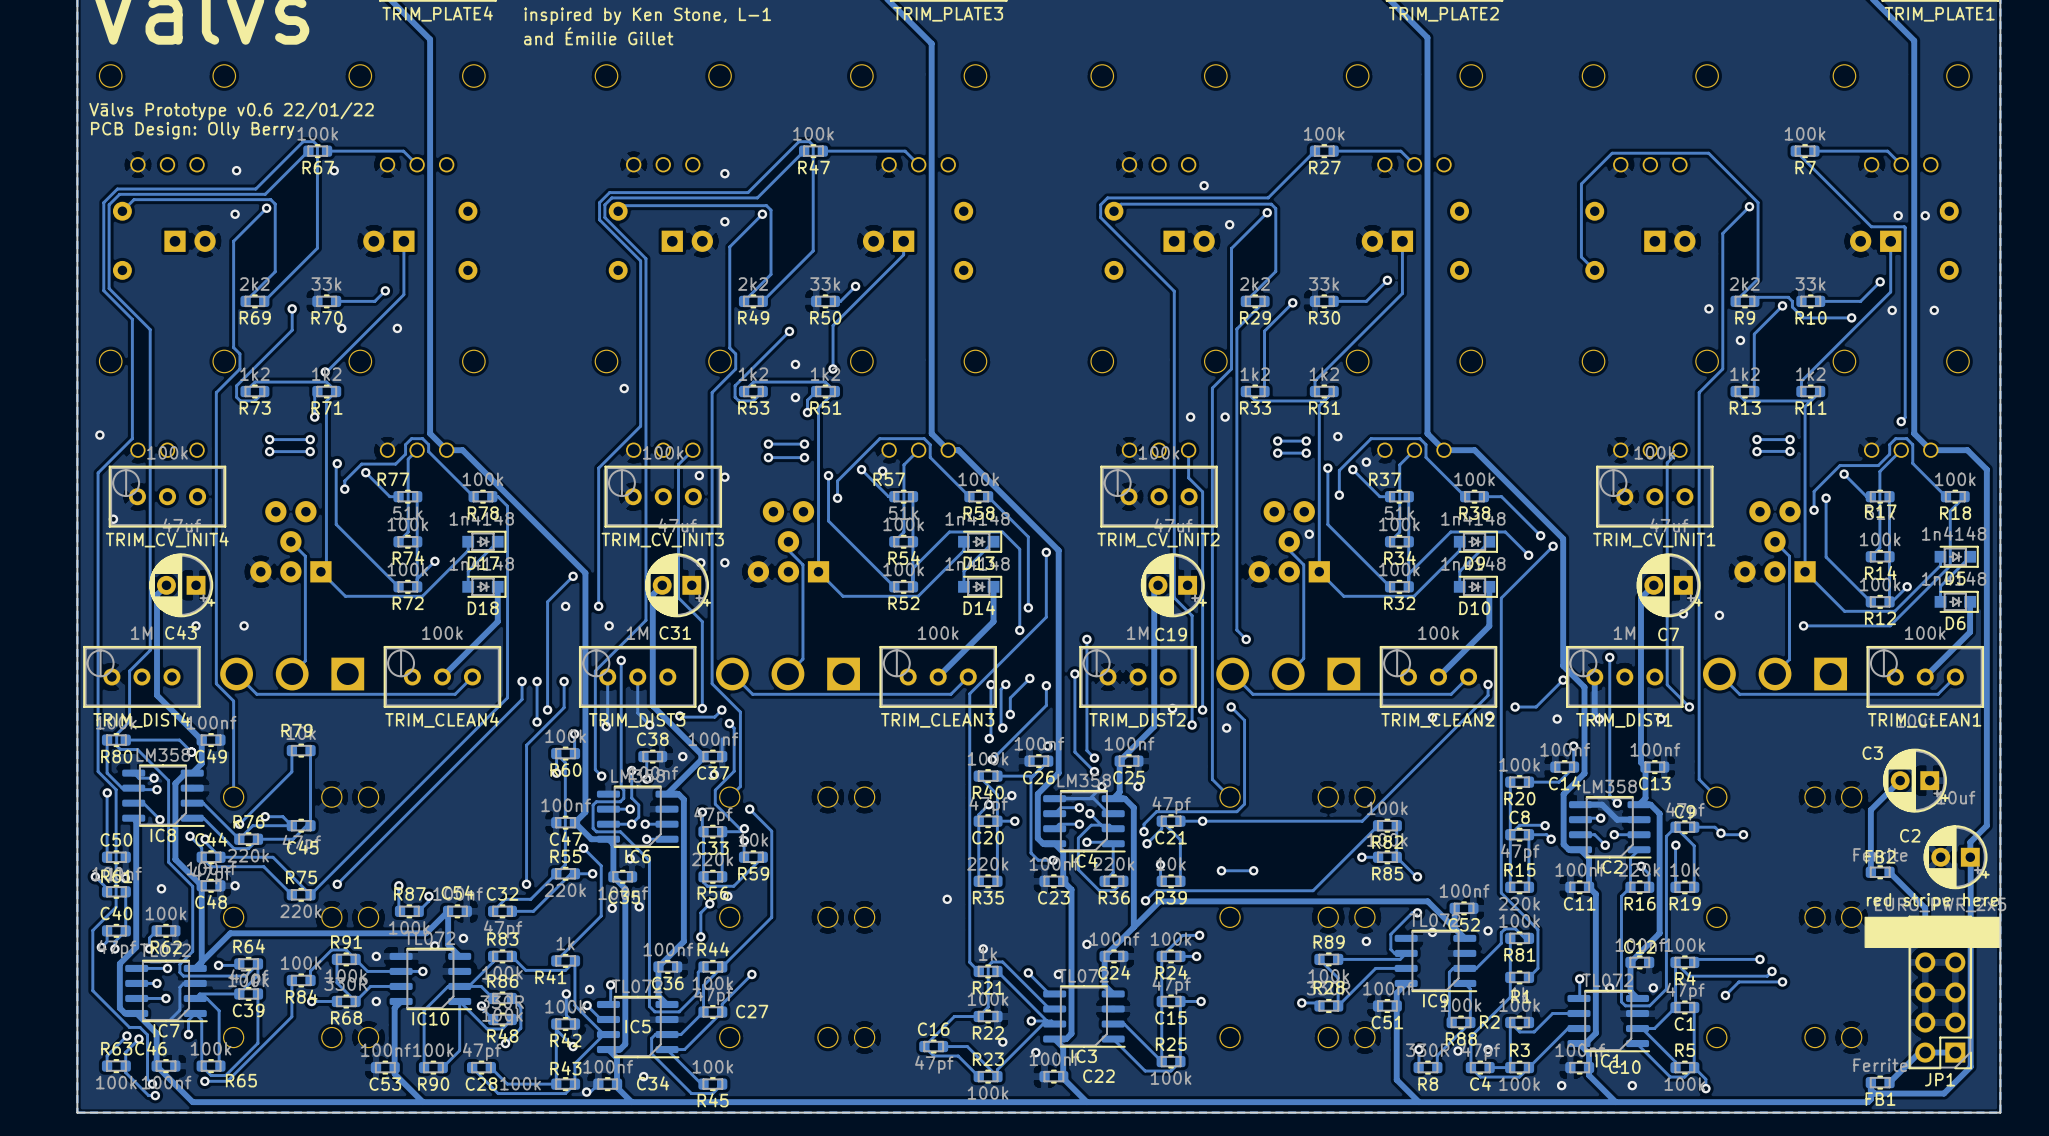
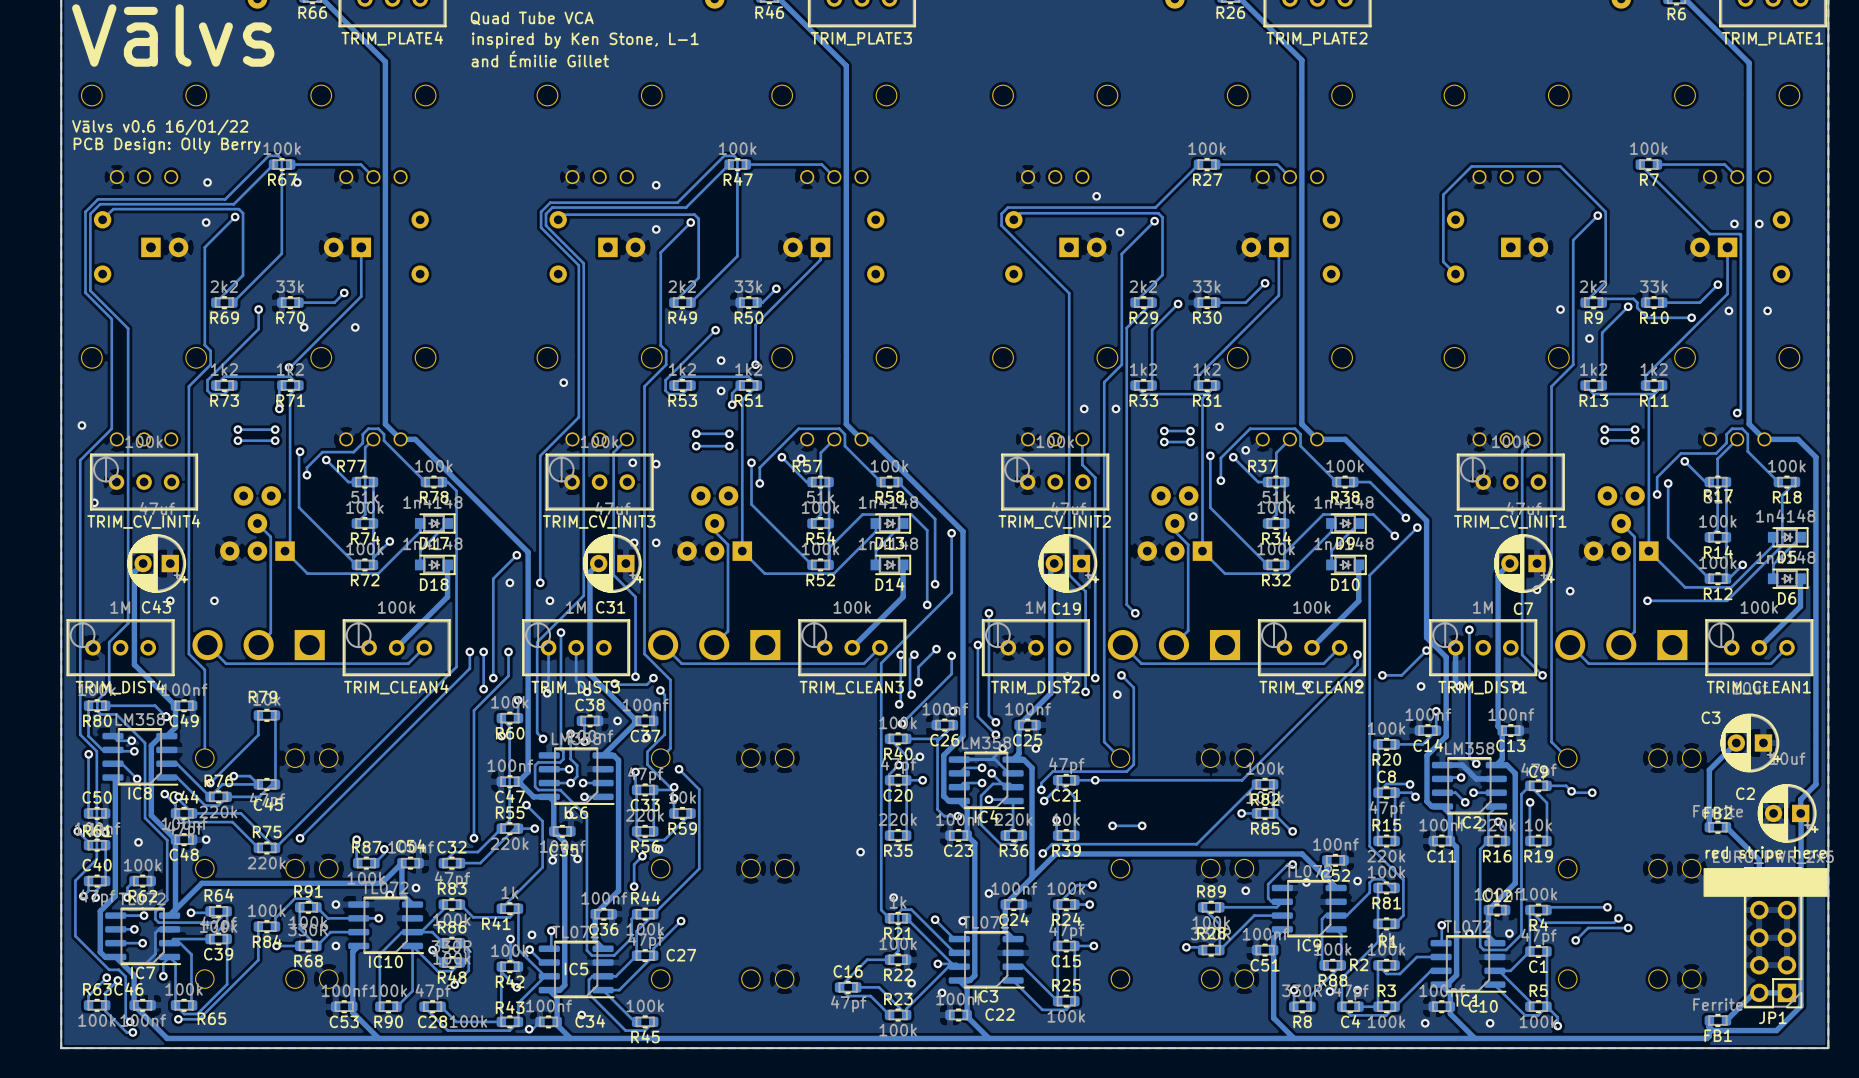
text: Vālvs Prototype v0.6 22/01/22 (231, 111) -> Vālvs v0.6 16/01/22 (160, 127)

